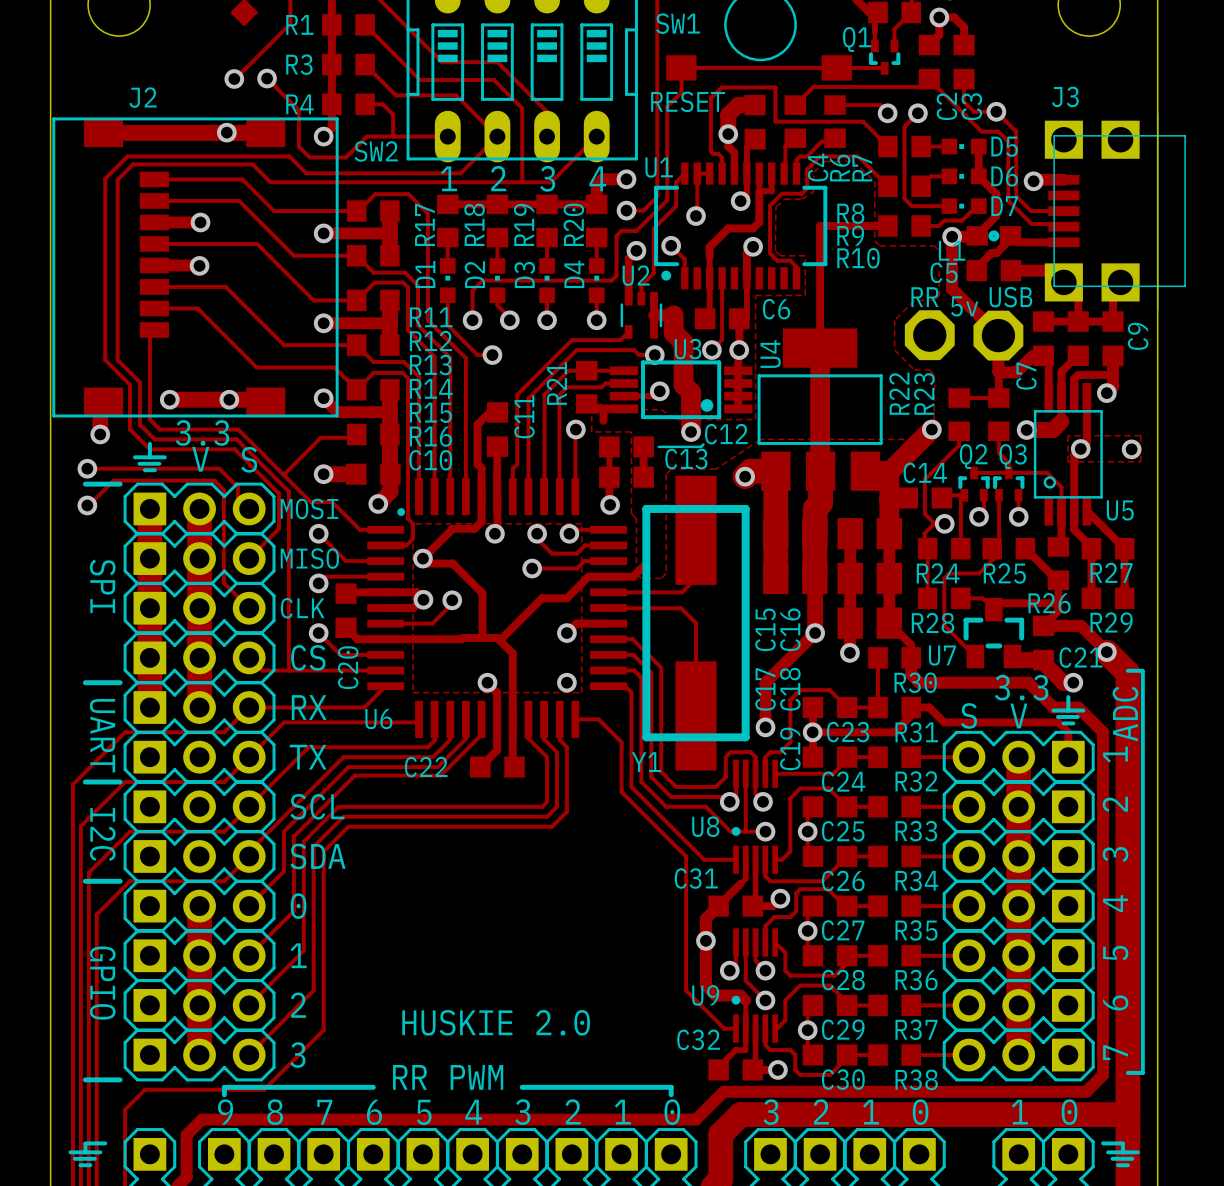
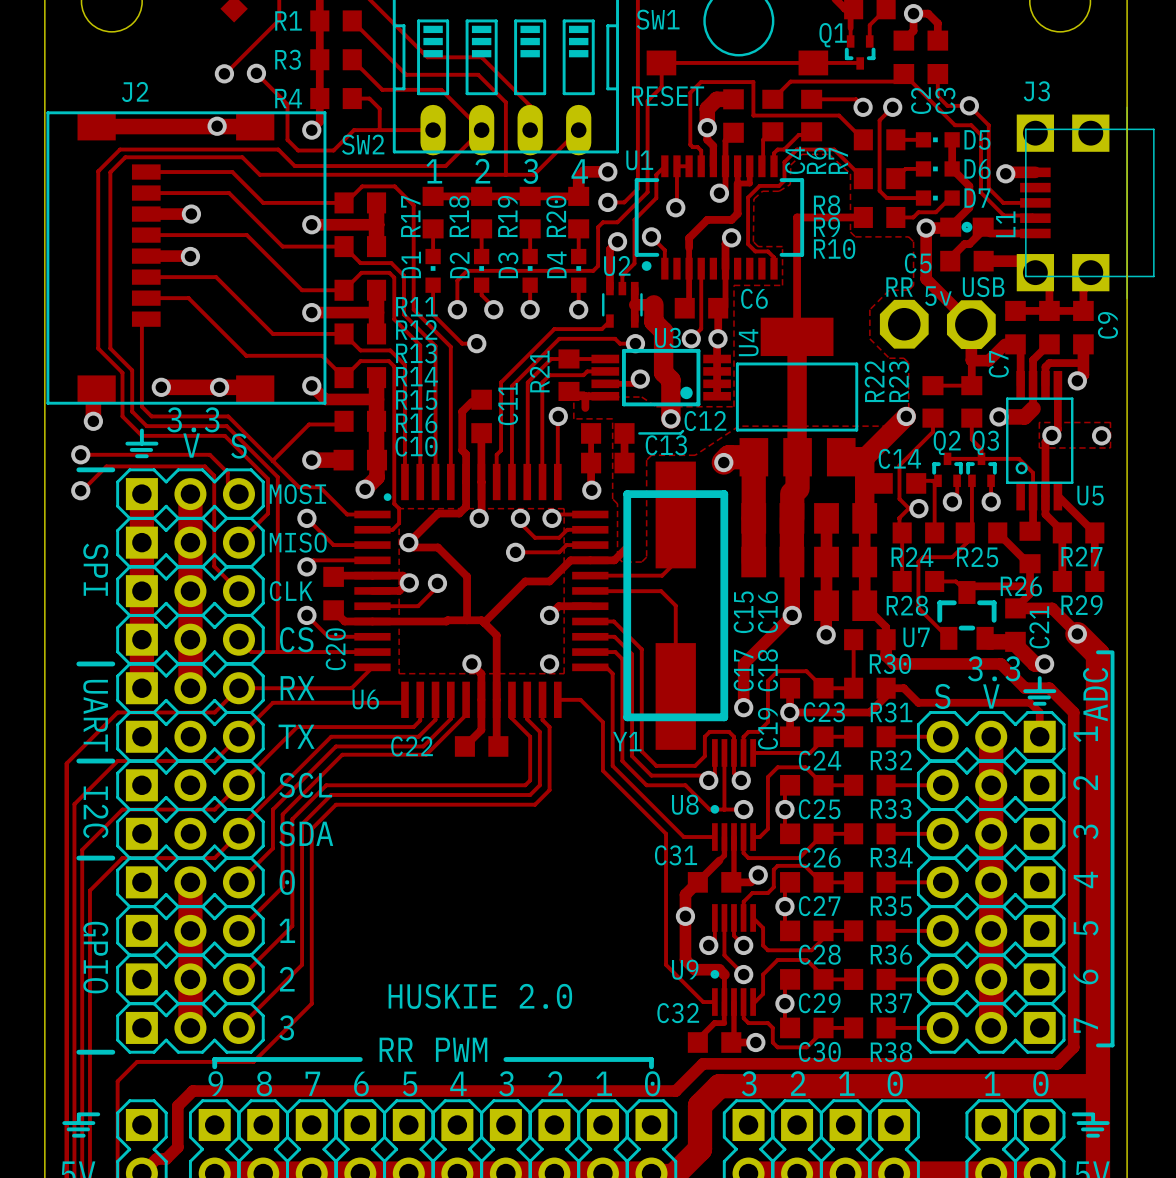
L1 name rotation: 0° (952, 250) -> 90° counterclockwise (1005, 224)
L1 name position: L1 (952, 250) -> L1 (1005, 224)
C21 name rotation: 0° (1081, 657) -> 90° counterclockwise (1039, 627)

